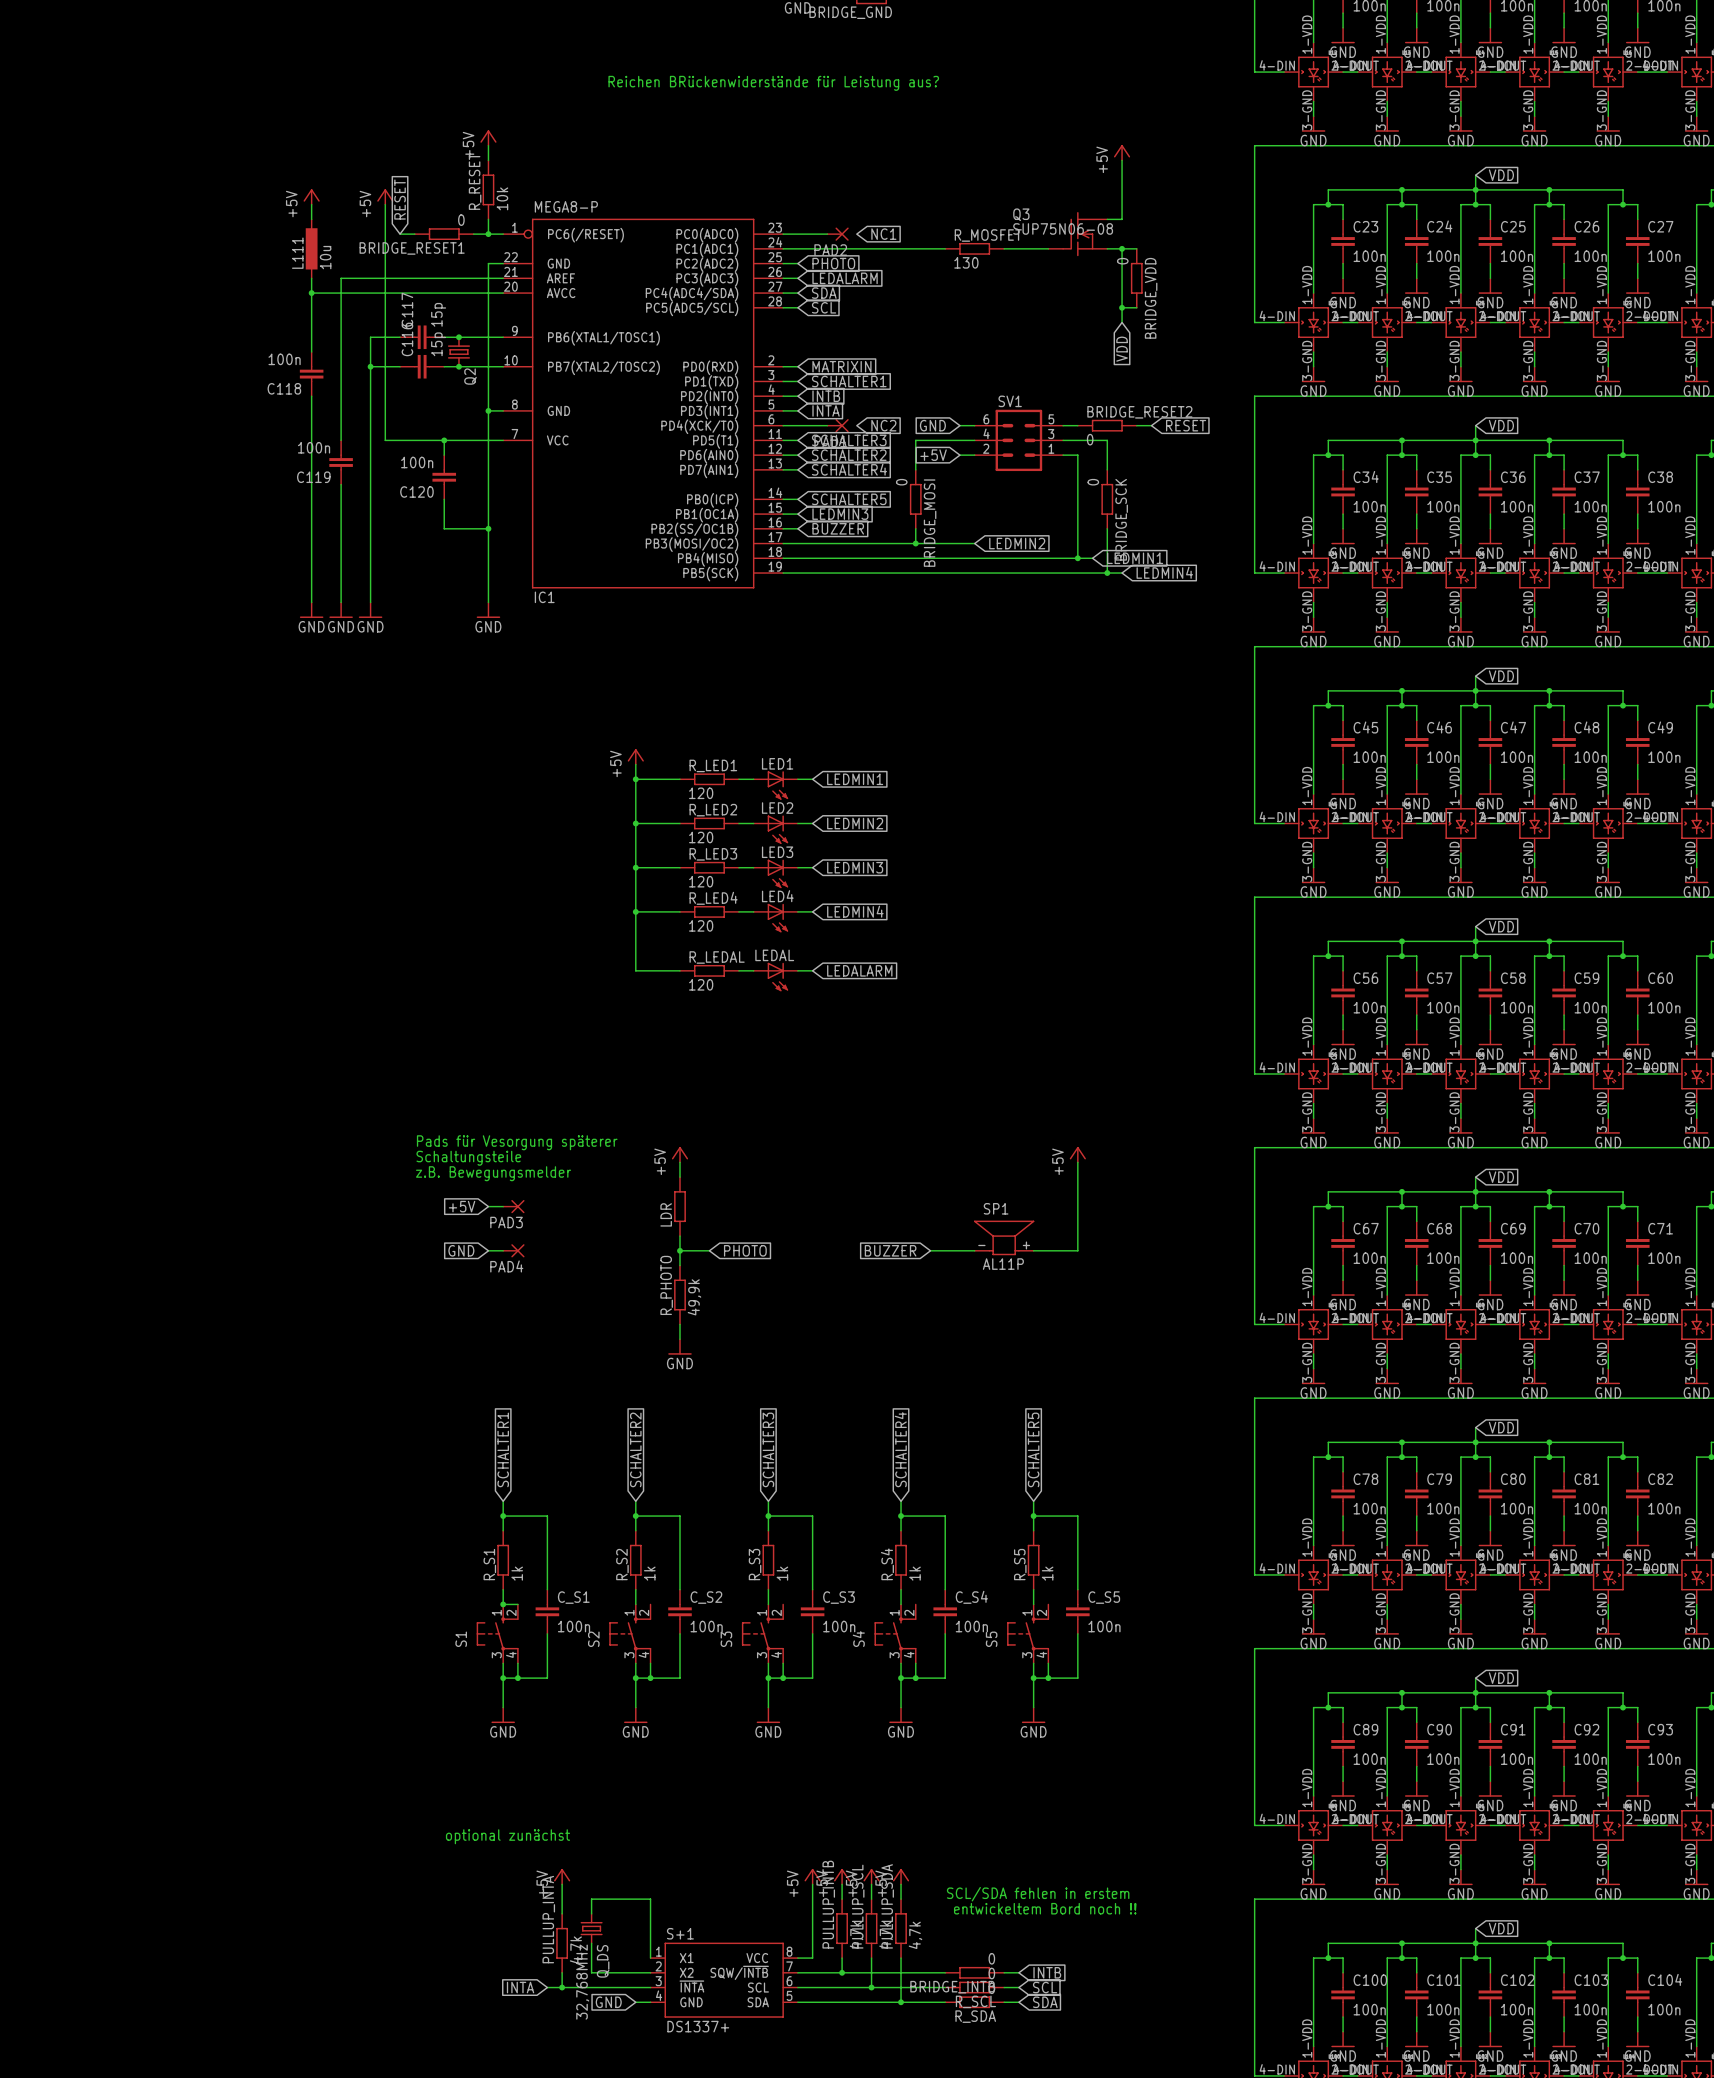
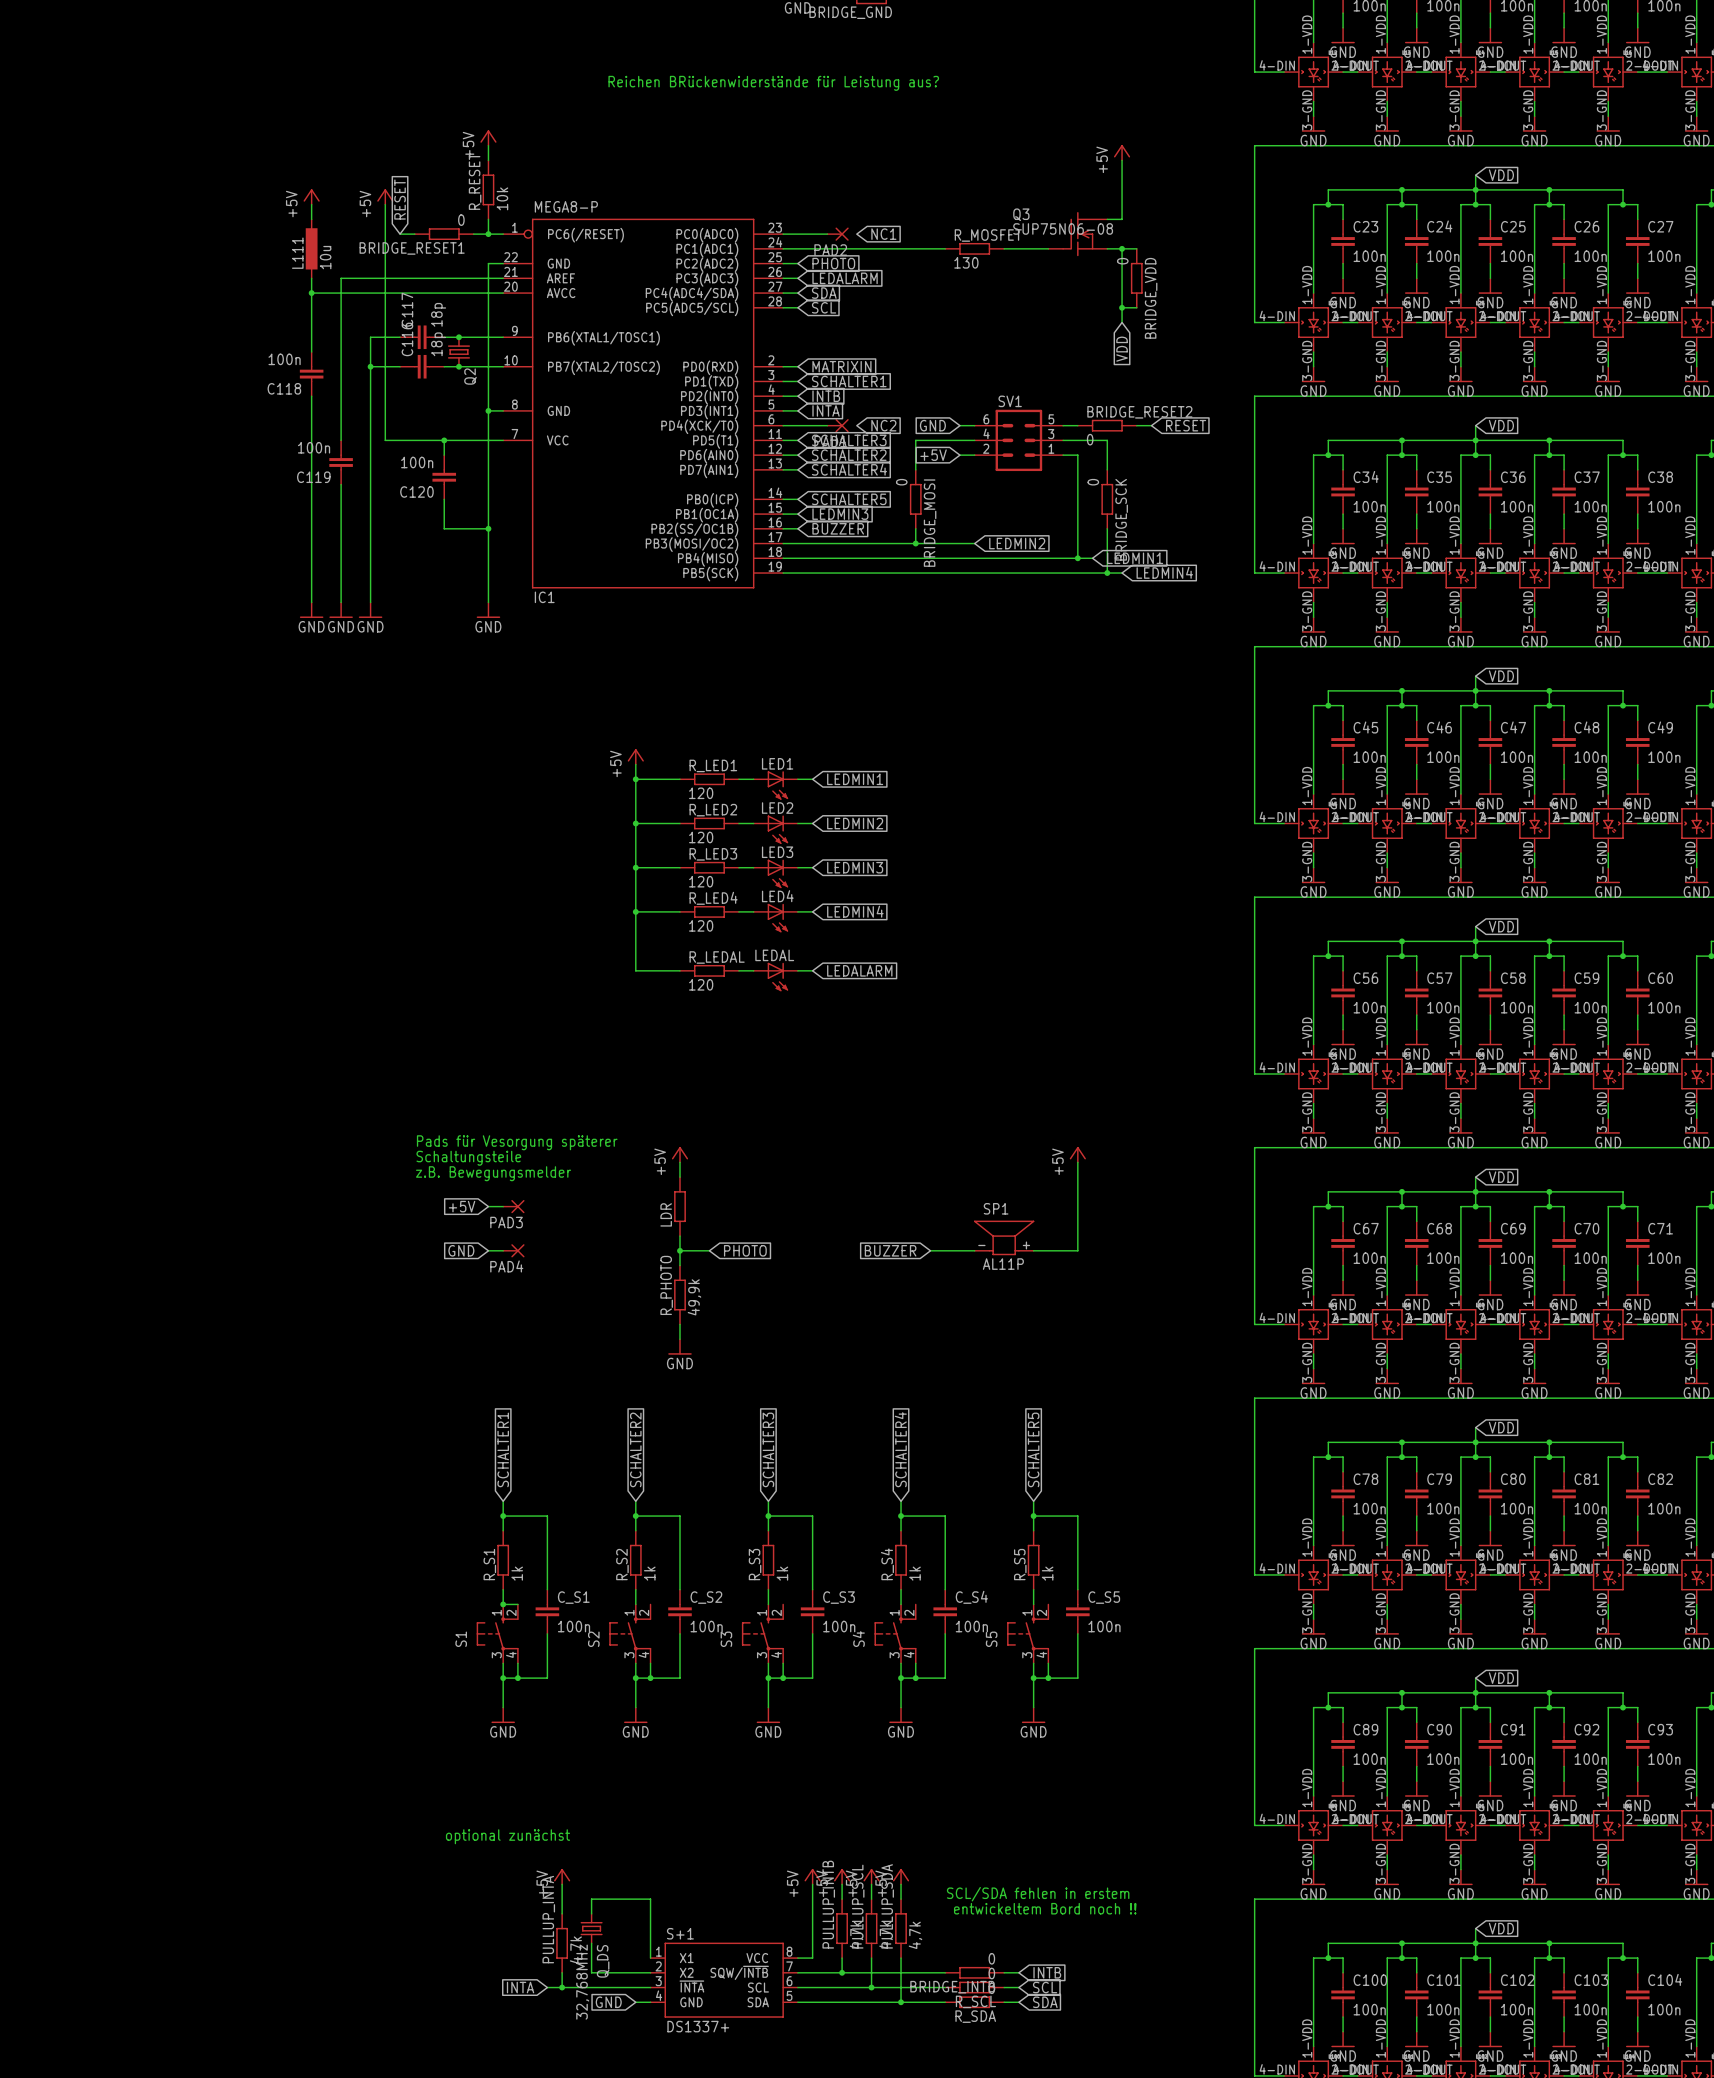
C117 value: 15p (438, 314) -> 18p (438, 314)
C116 value: 15p (438, 344) -> 18p (438, 344)

